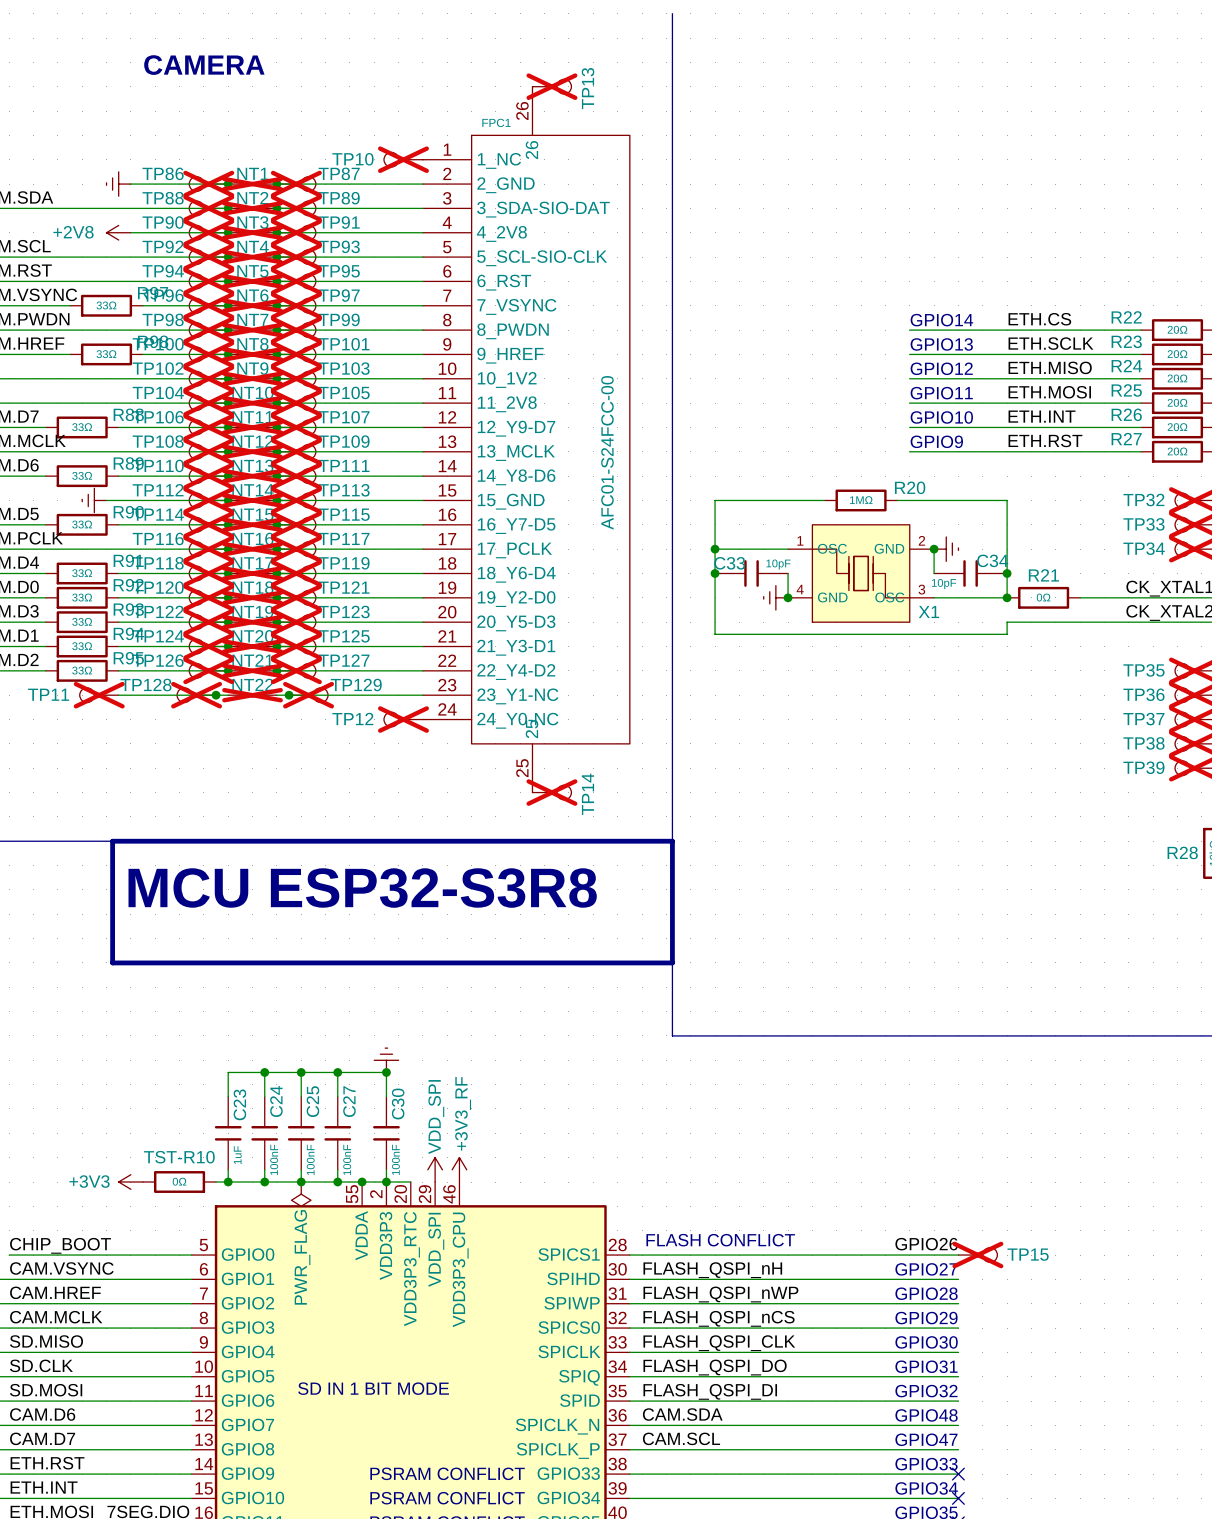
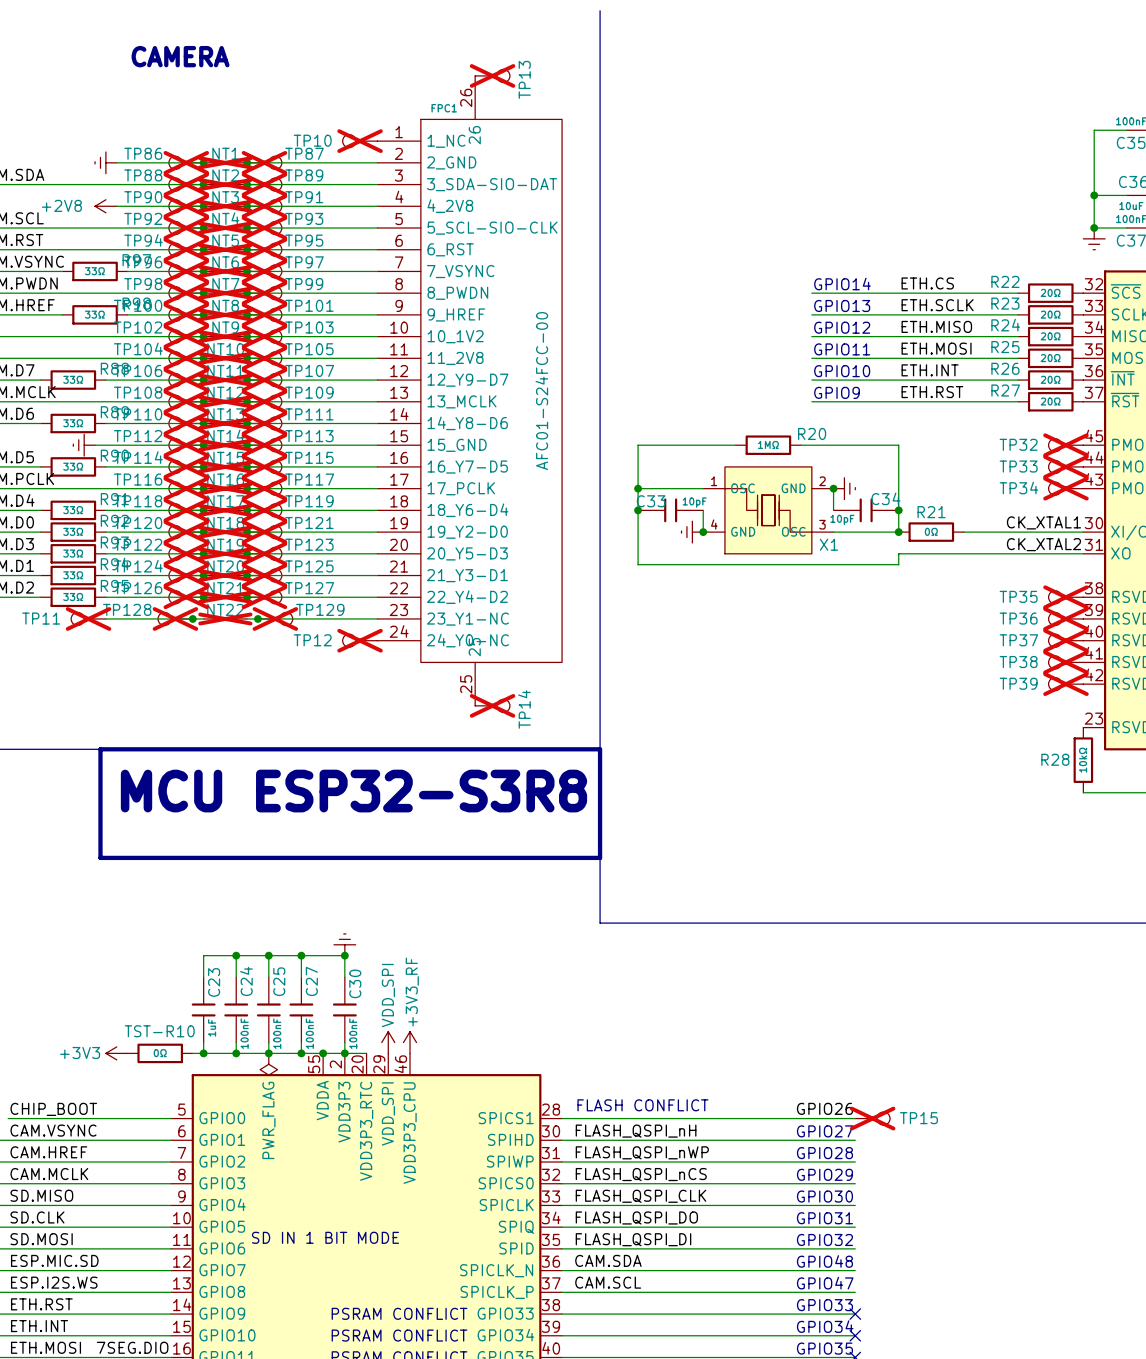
label: CAM.D6 (42, 1414) -> ESP.MIC.SD (54, 1260)
label: CAM.D7 (42, 1438) -> ESP.I2S.WS (54, 1282)

